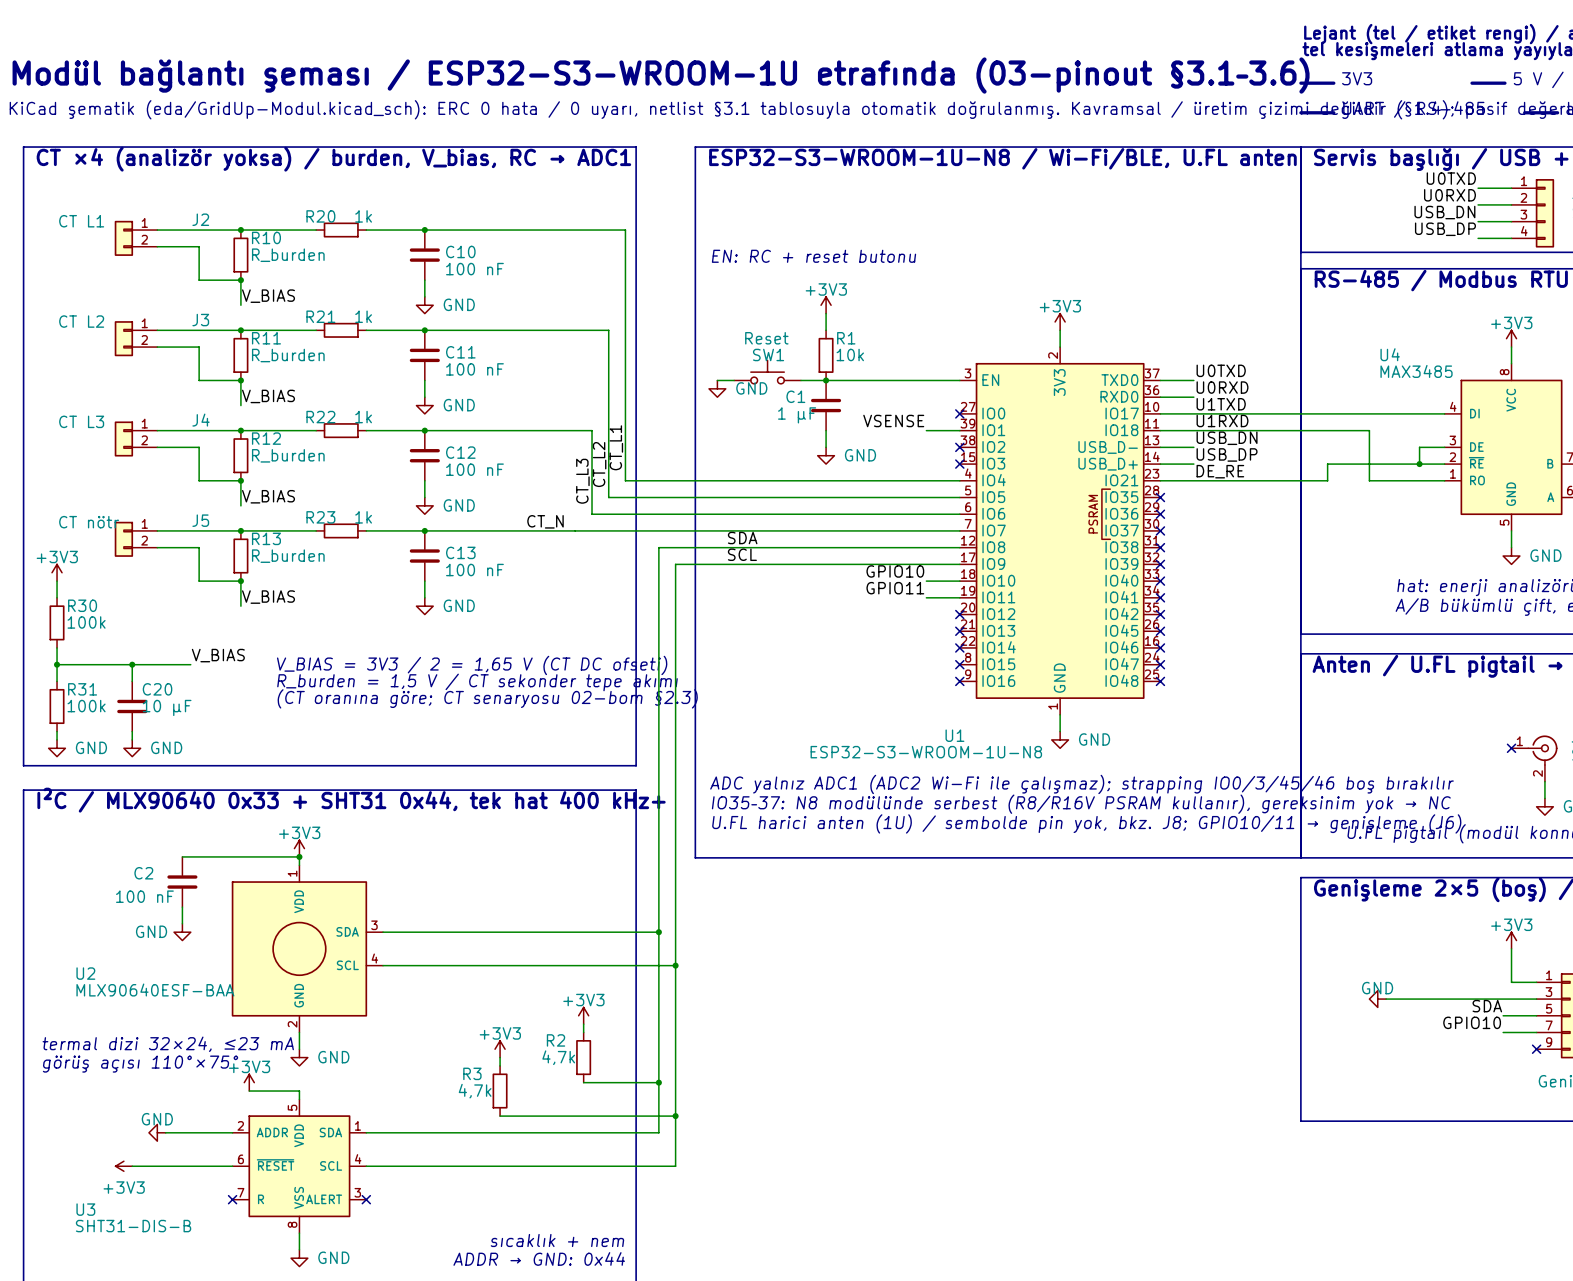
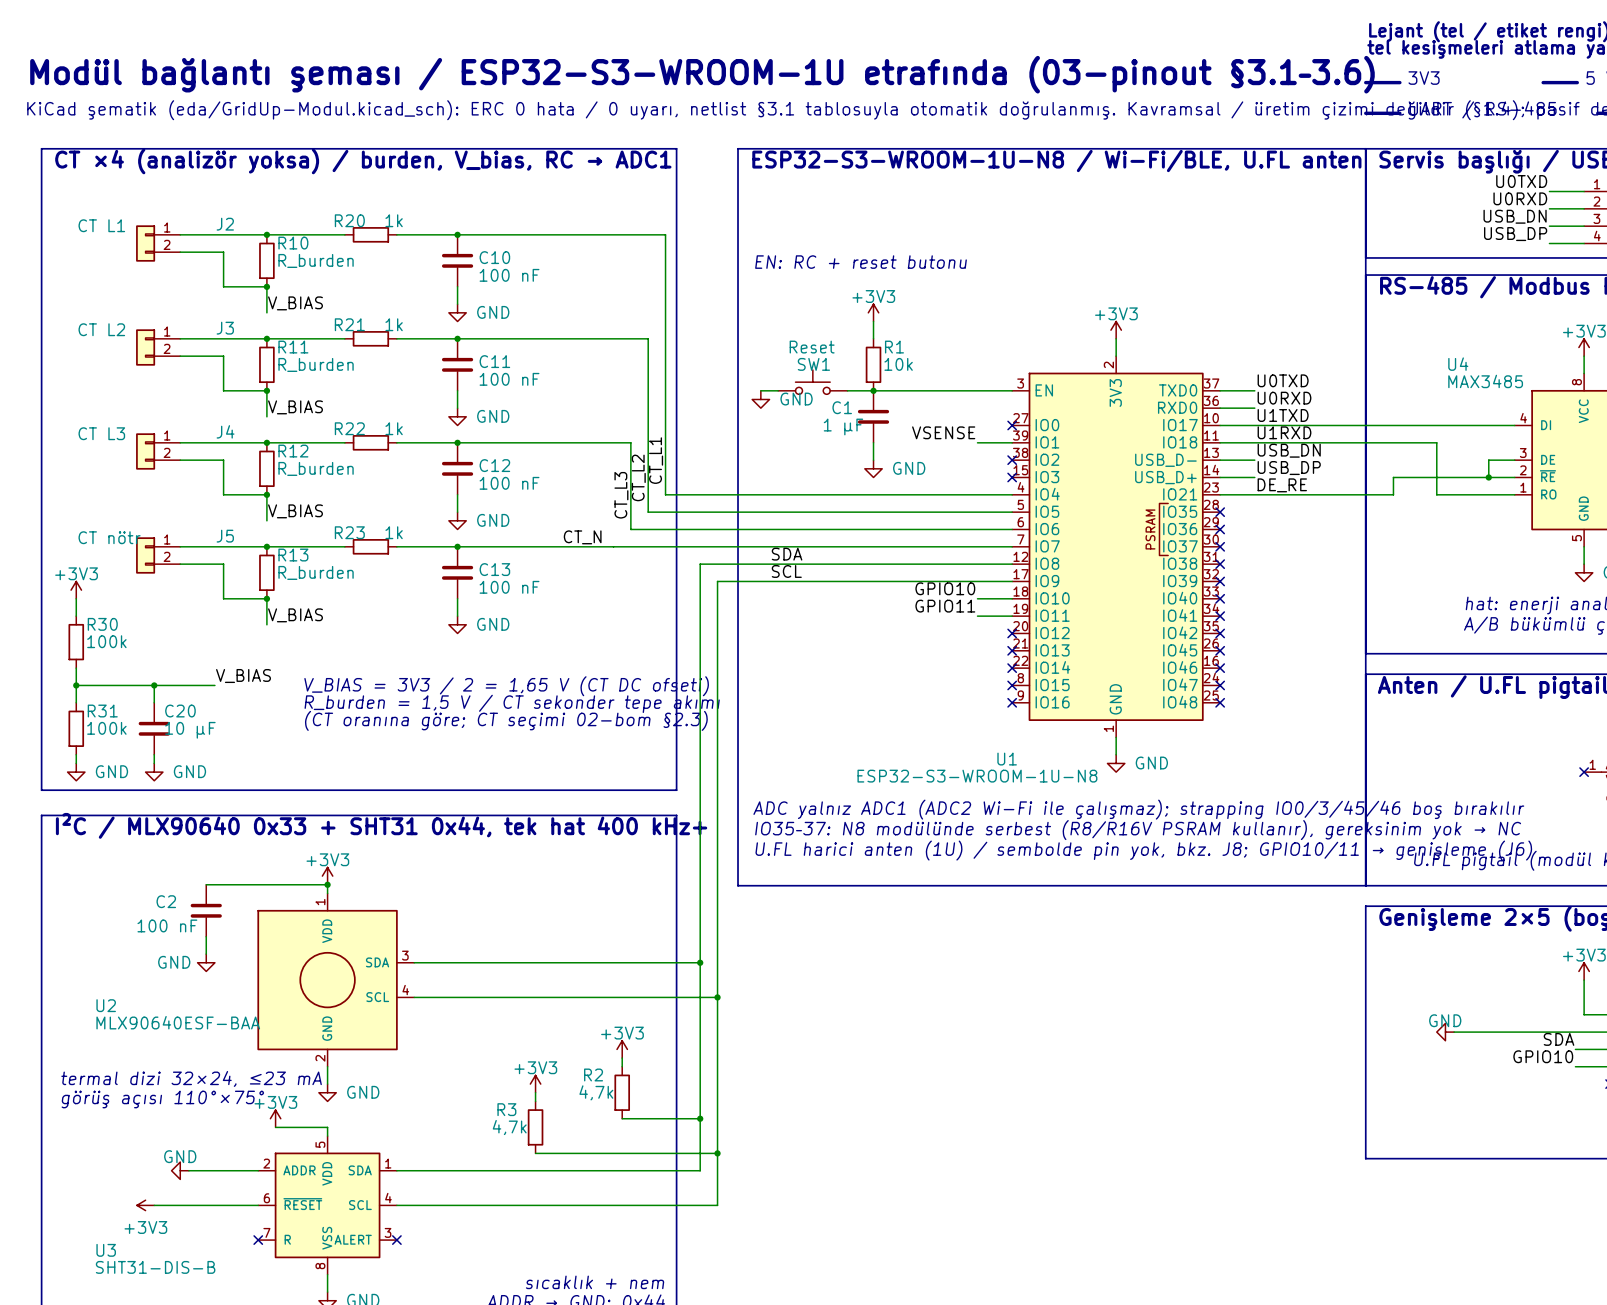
text: (CT oranına göre; CT senaryosu 02-bom §2.3) (487, 698) -> (CT oranına göre; CT seçimi 02-bom §2.3) (506, 720)

